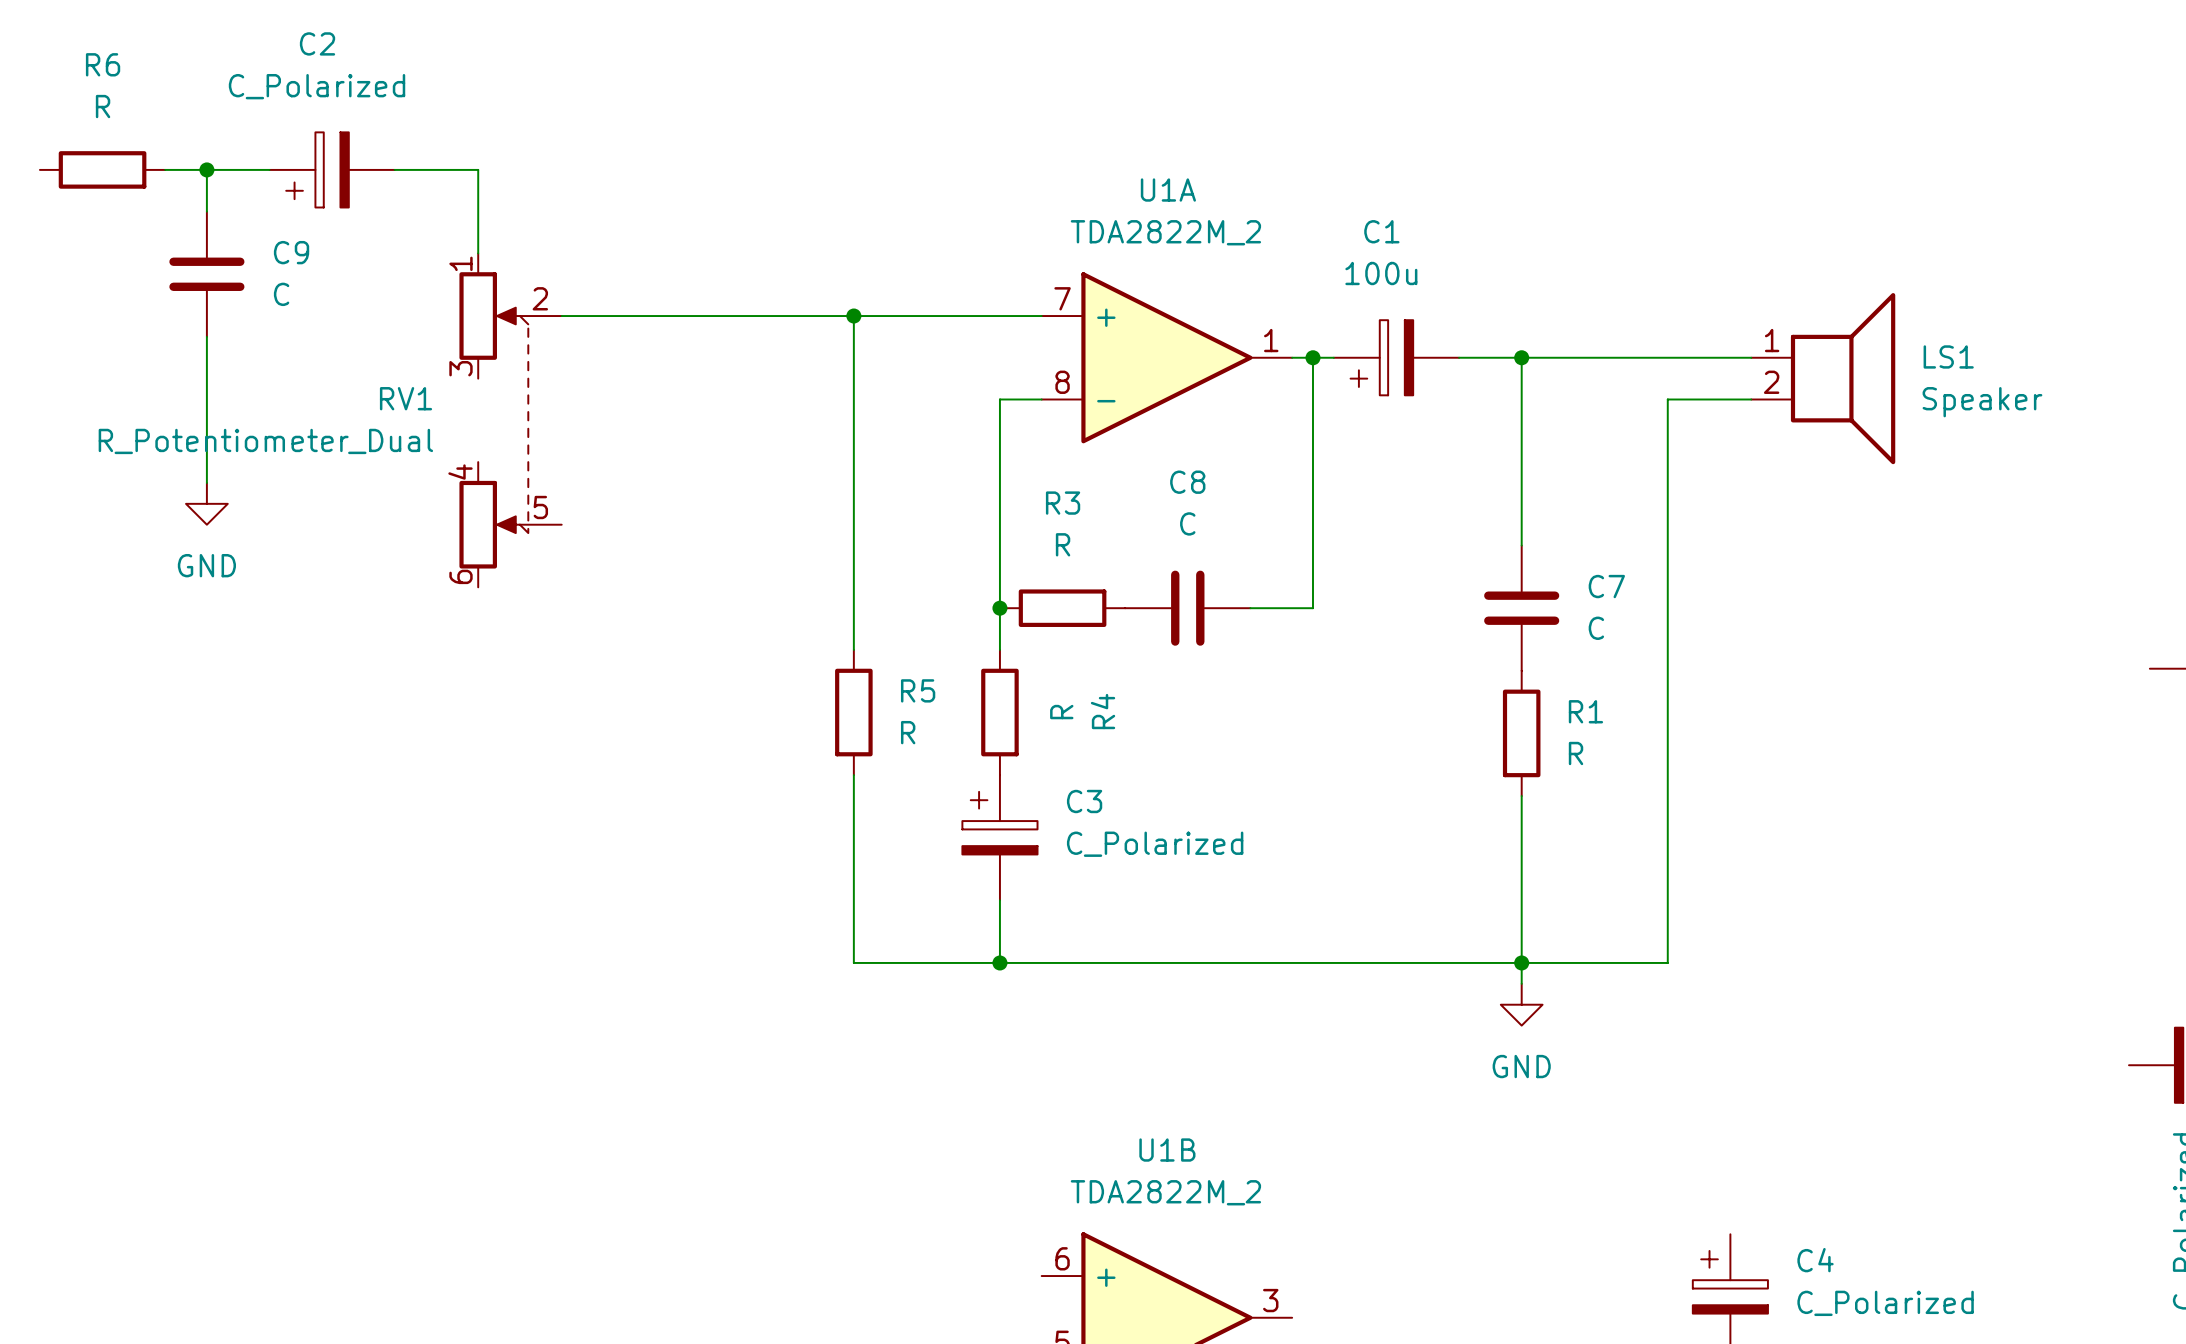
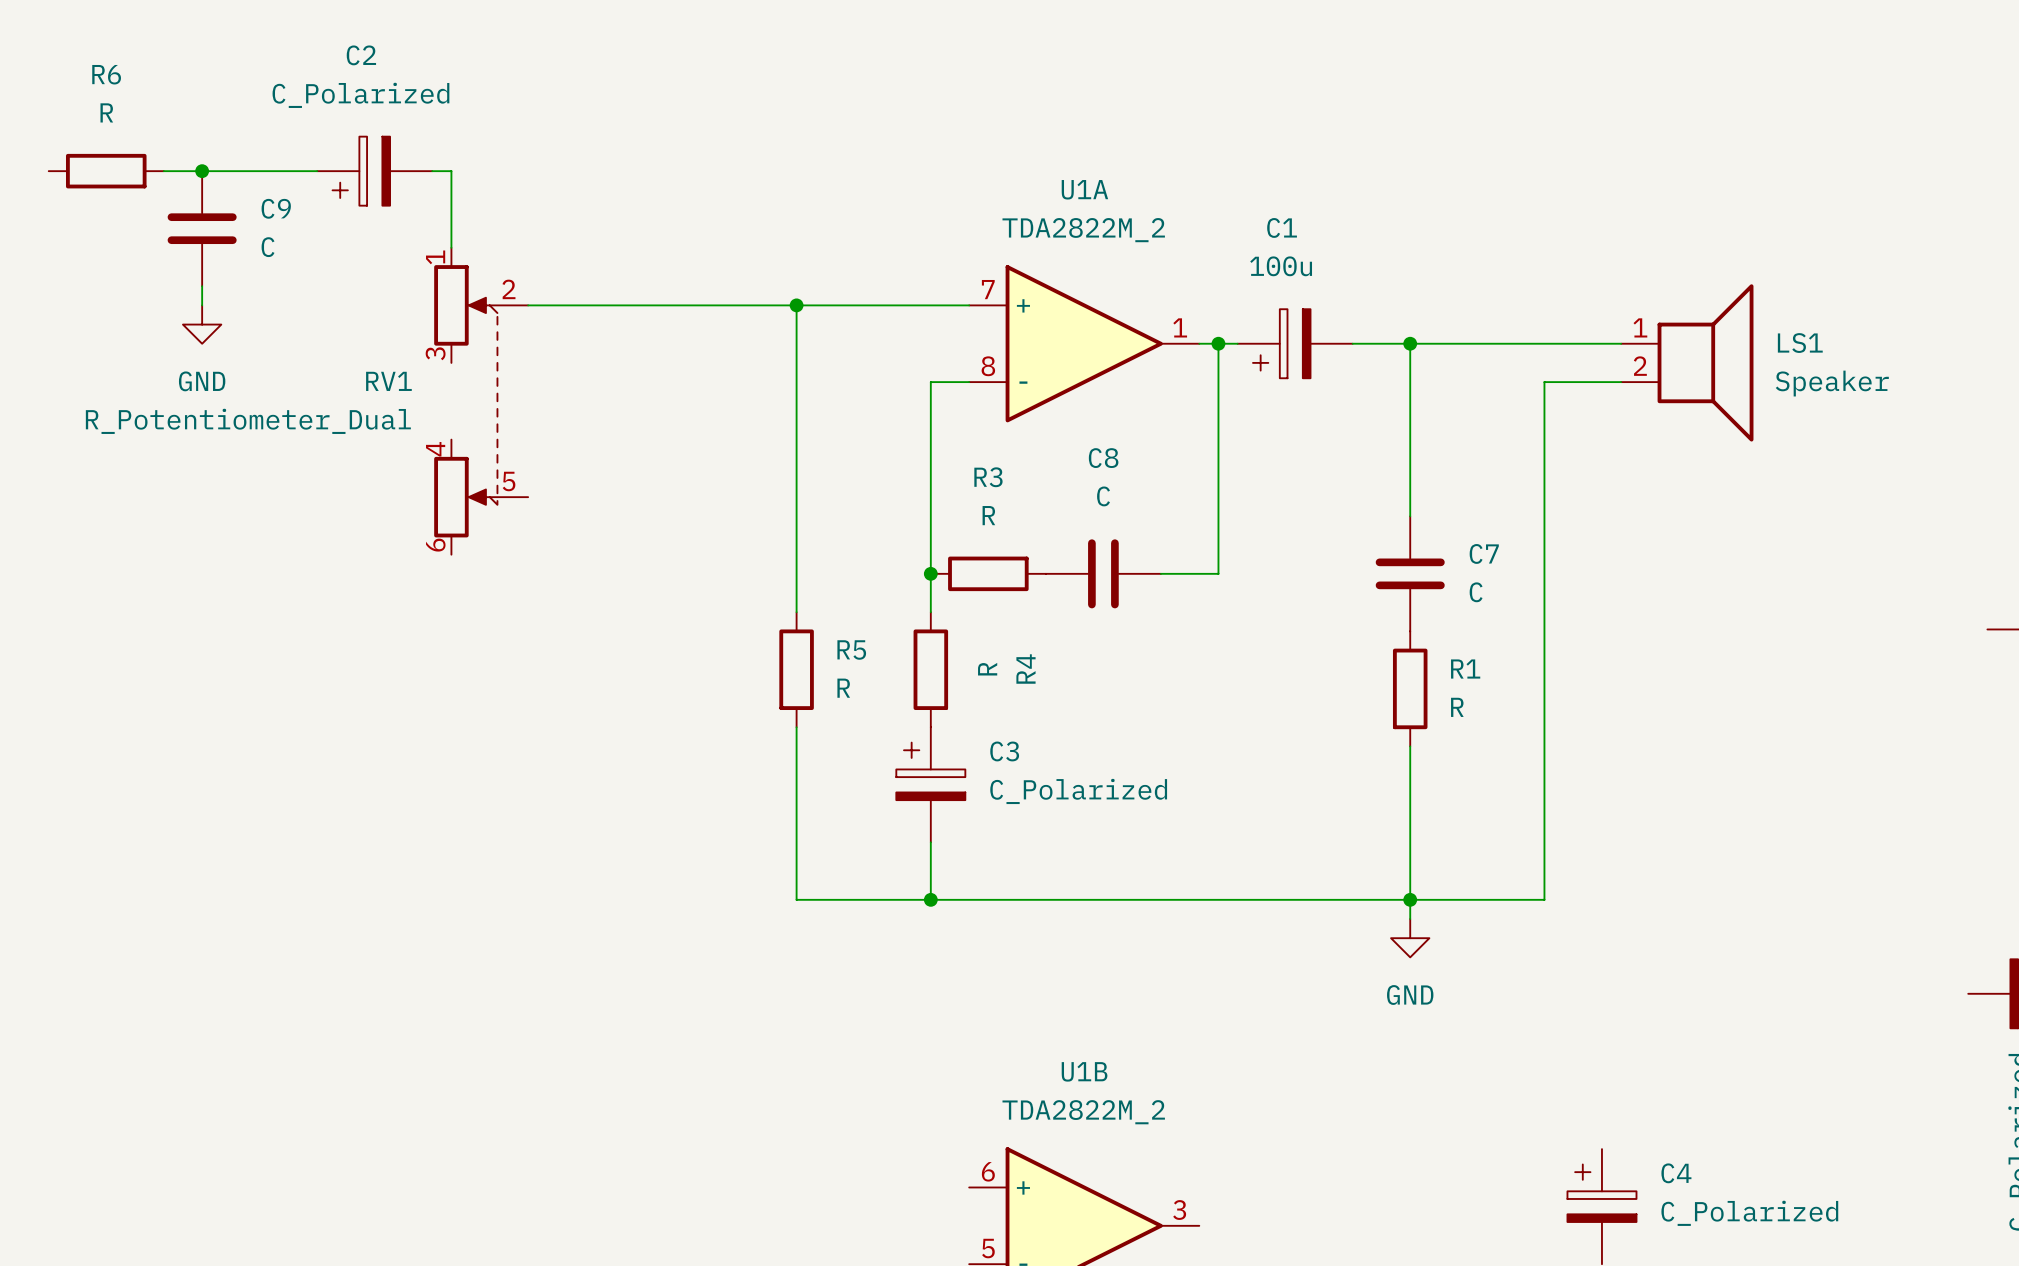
C2 position: (332, 169) -> (374, 171)
C9 position: (206, 274) -> (202, 228)
wire: (206, 336) (206, 482) -> none
power symbol position: GND (206, 503) -> GND (202, 324)

